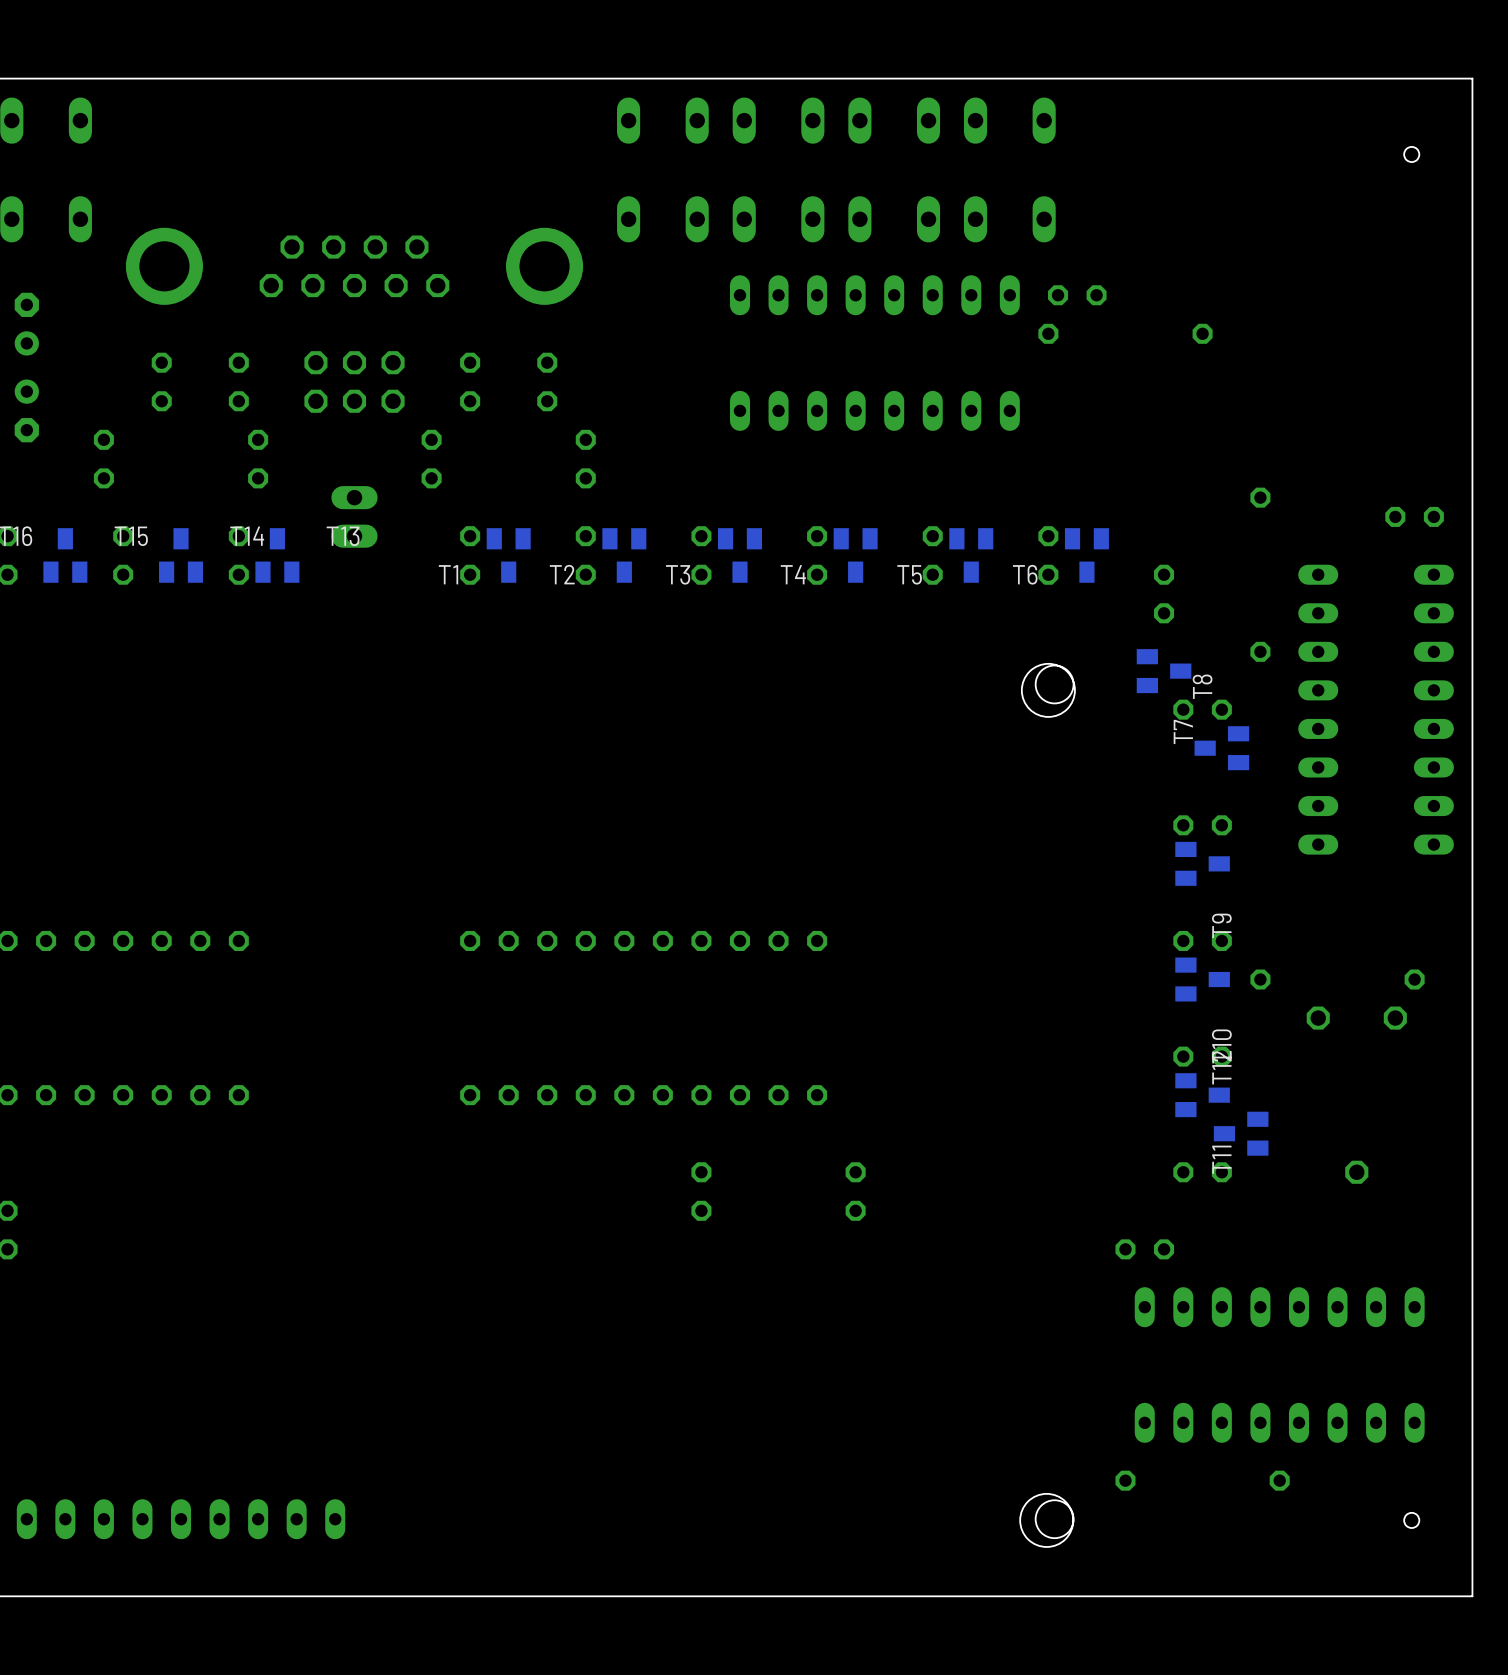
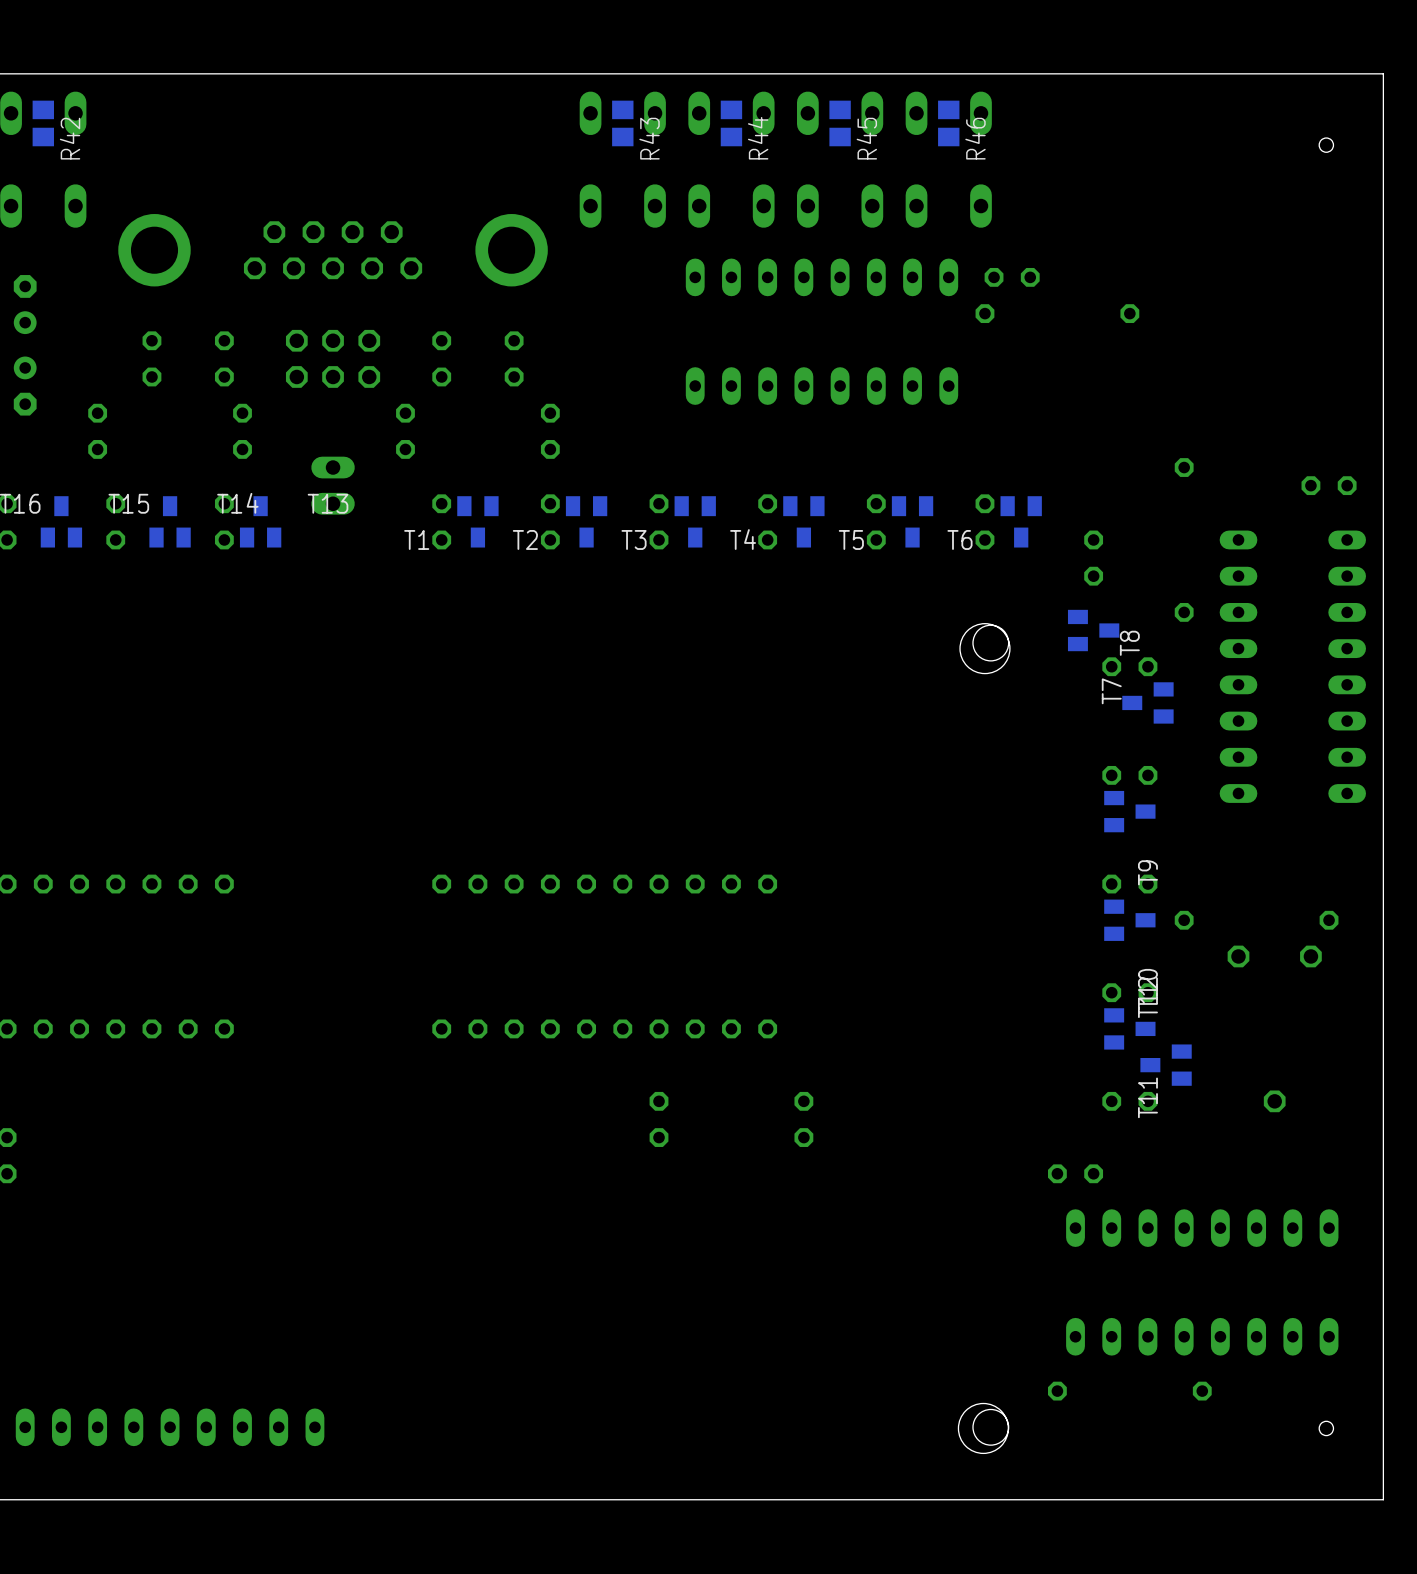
R42: none -> (43, 123)
R43: none -> (622, 123)
R44: none -> (731, 123)
R45: none -> (840, 123)
R46: none -> (948, 123)

